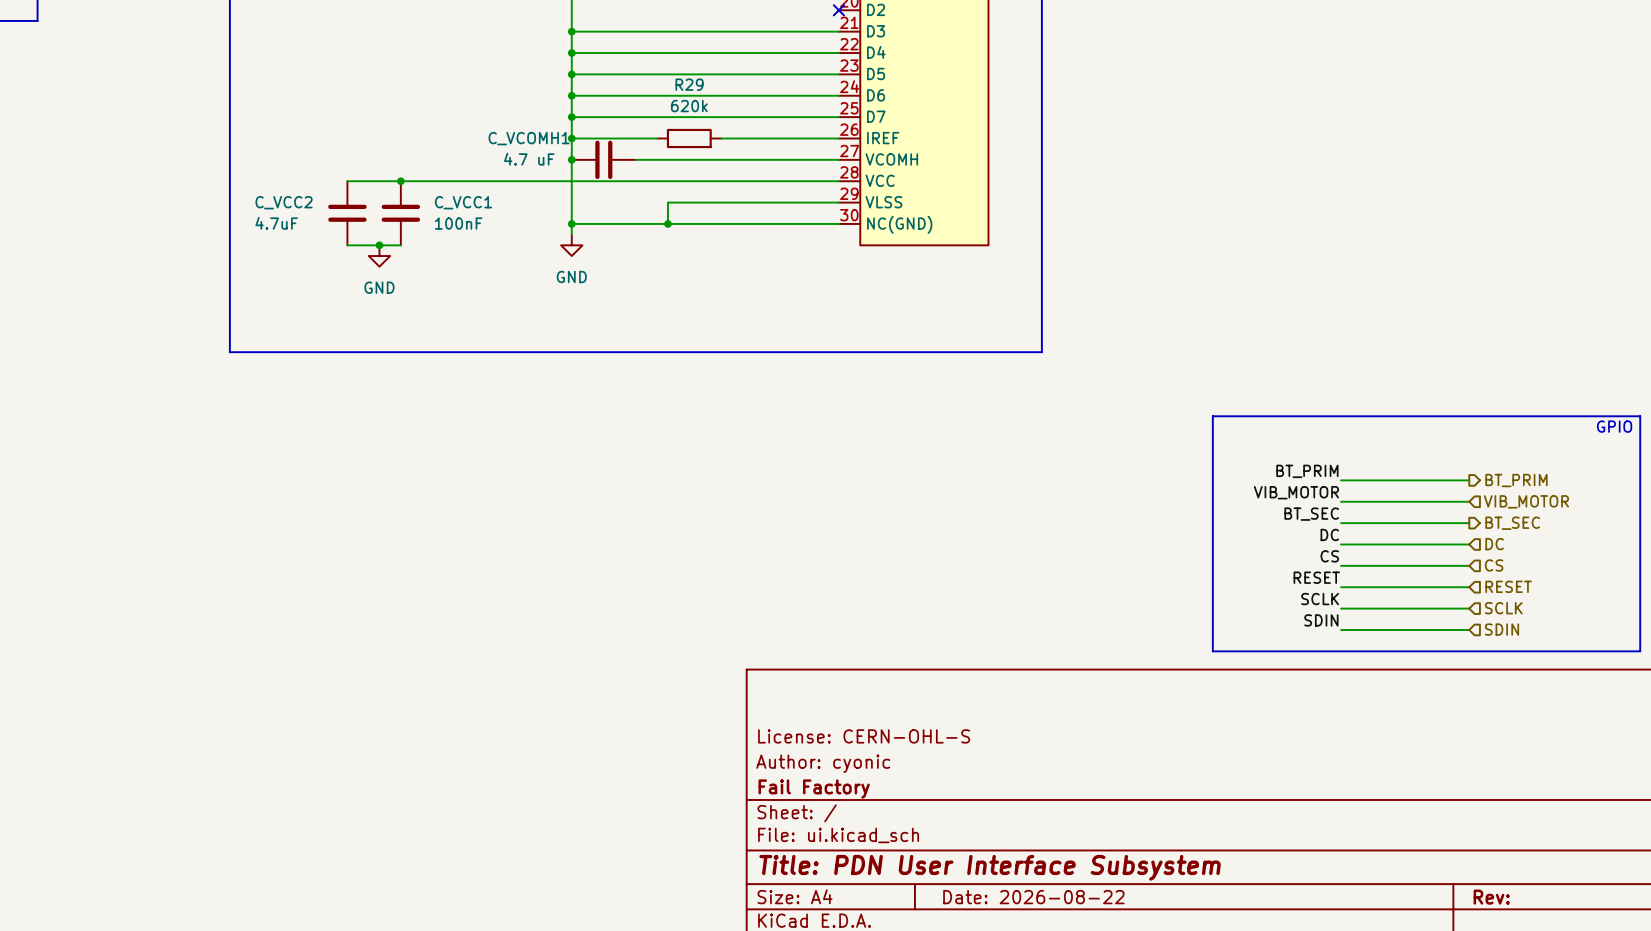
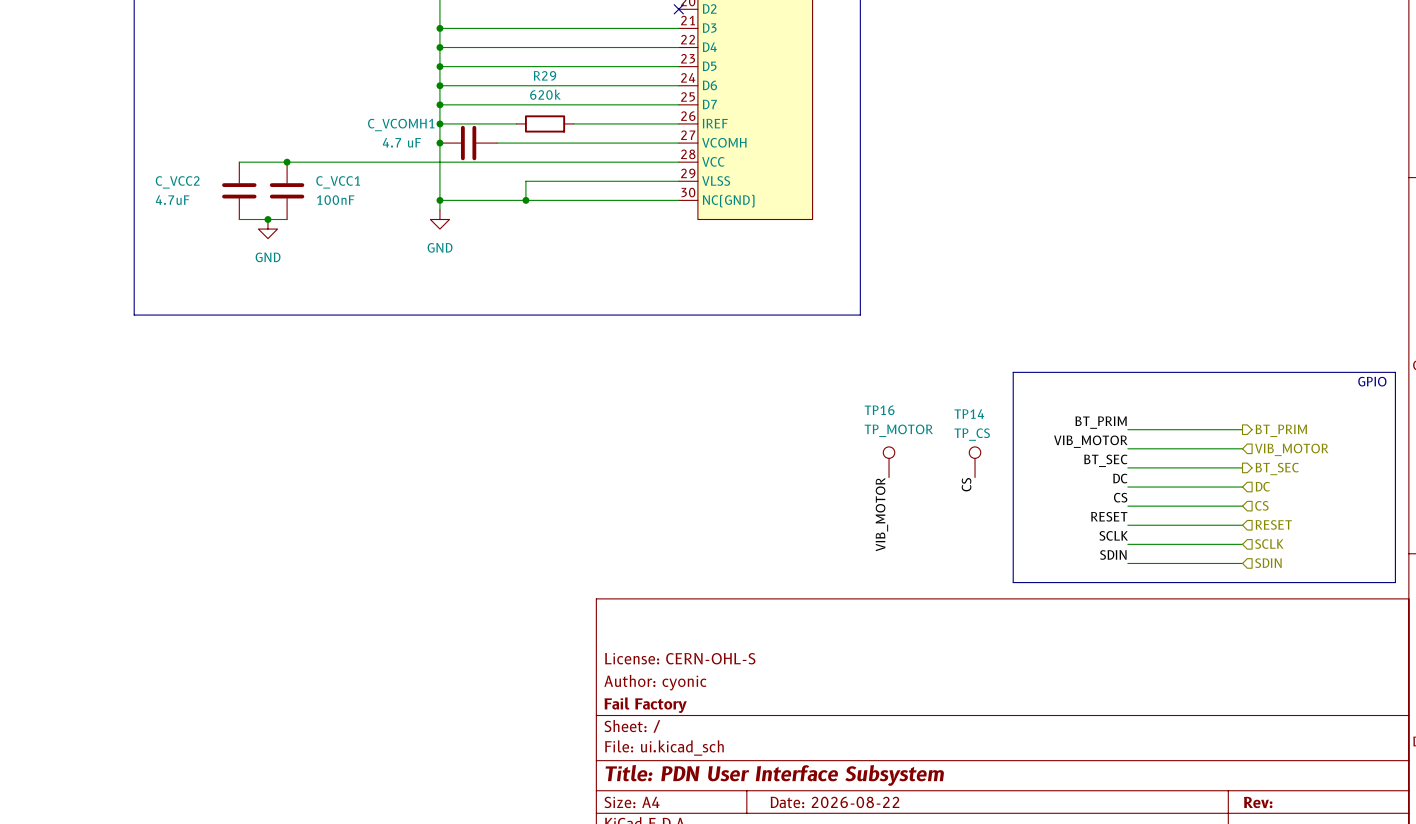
TP16: none -> TP_MOTOR (889, 462)
TP14: none -> TP_CS (975, 462)
label: none -> CS (966, 484)
label: none -> VIB_MOTOR (881, 514)

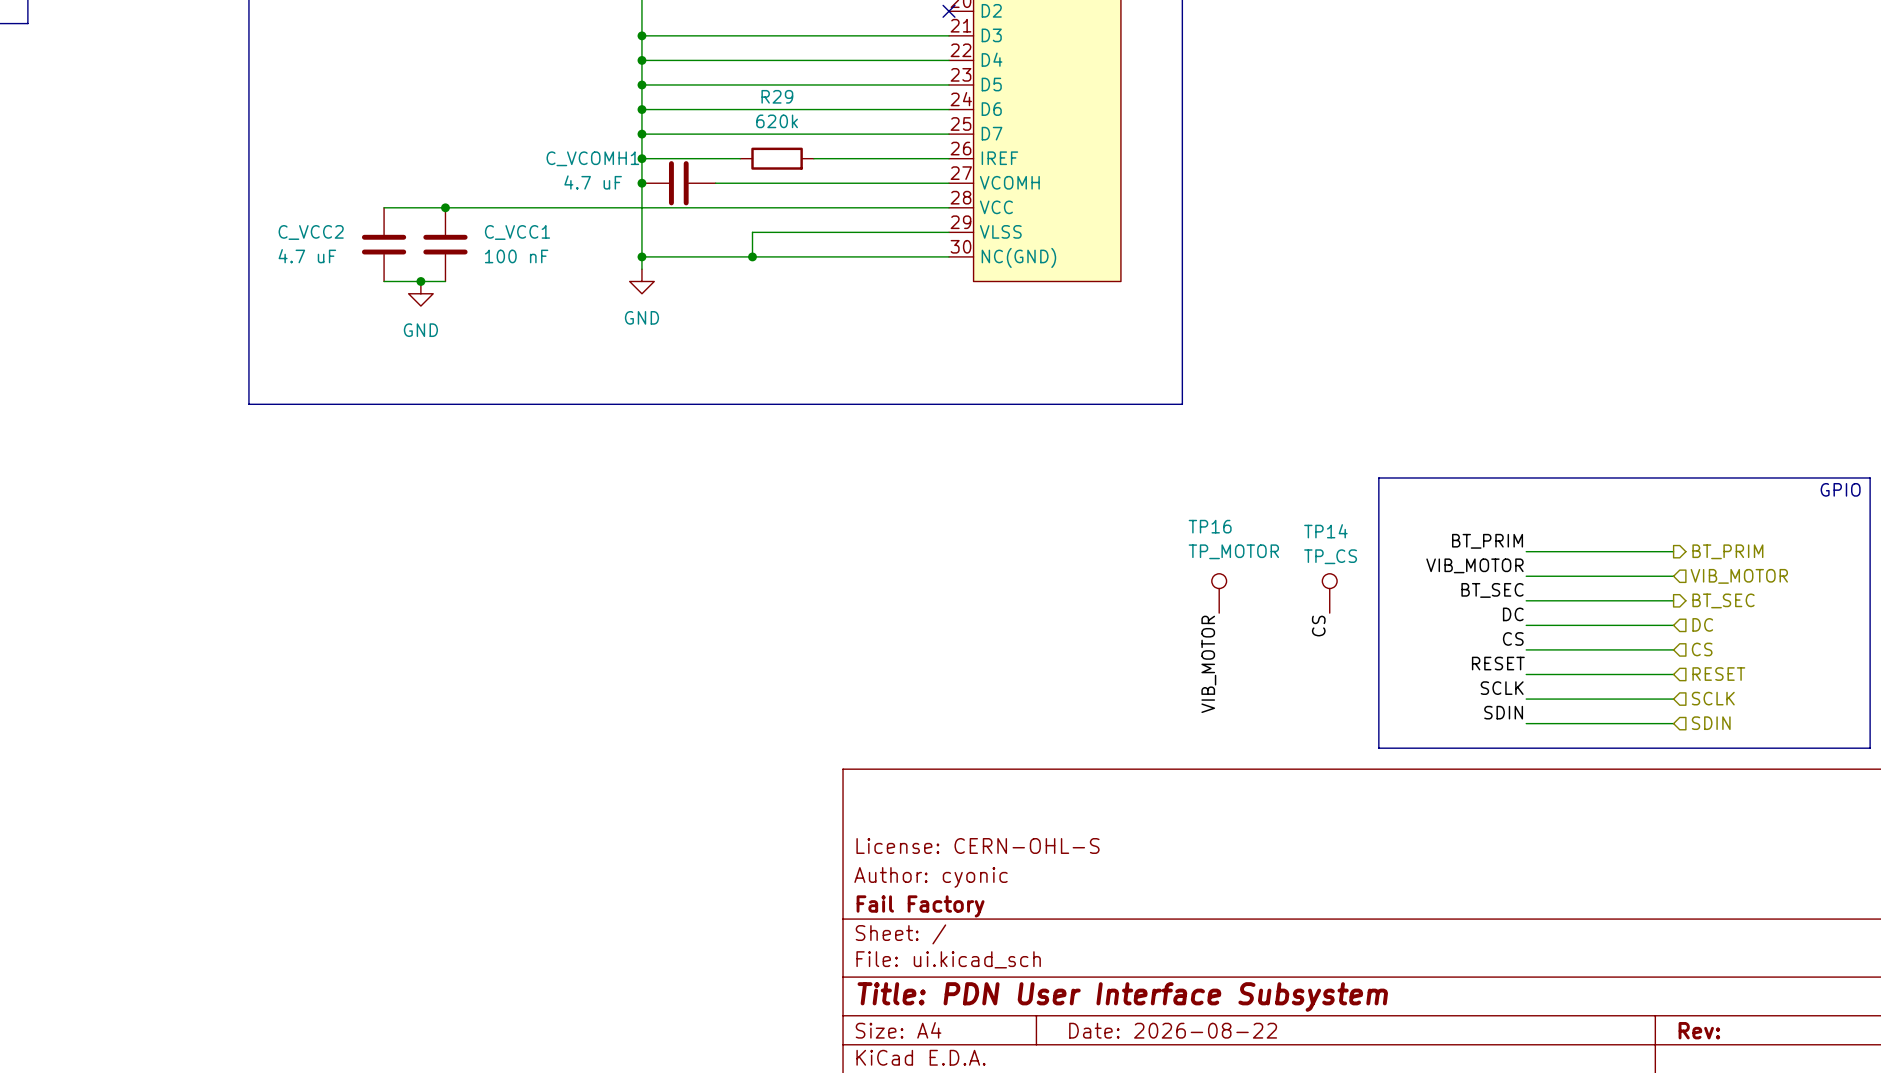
C_VCC2 value: 4.7uF (172, 200) -> 4.7 uF (307, 256)
C_VCC1 value: 100nF (335, 200) -> 100 nF (516, 256)

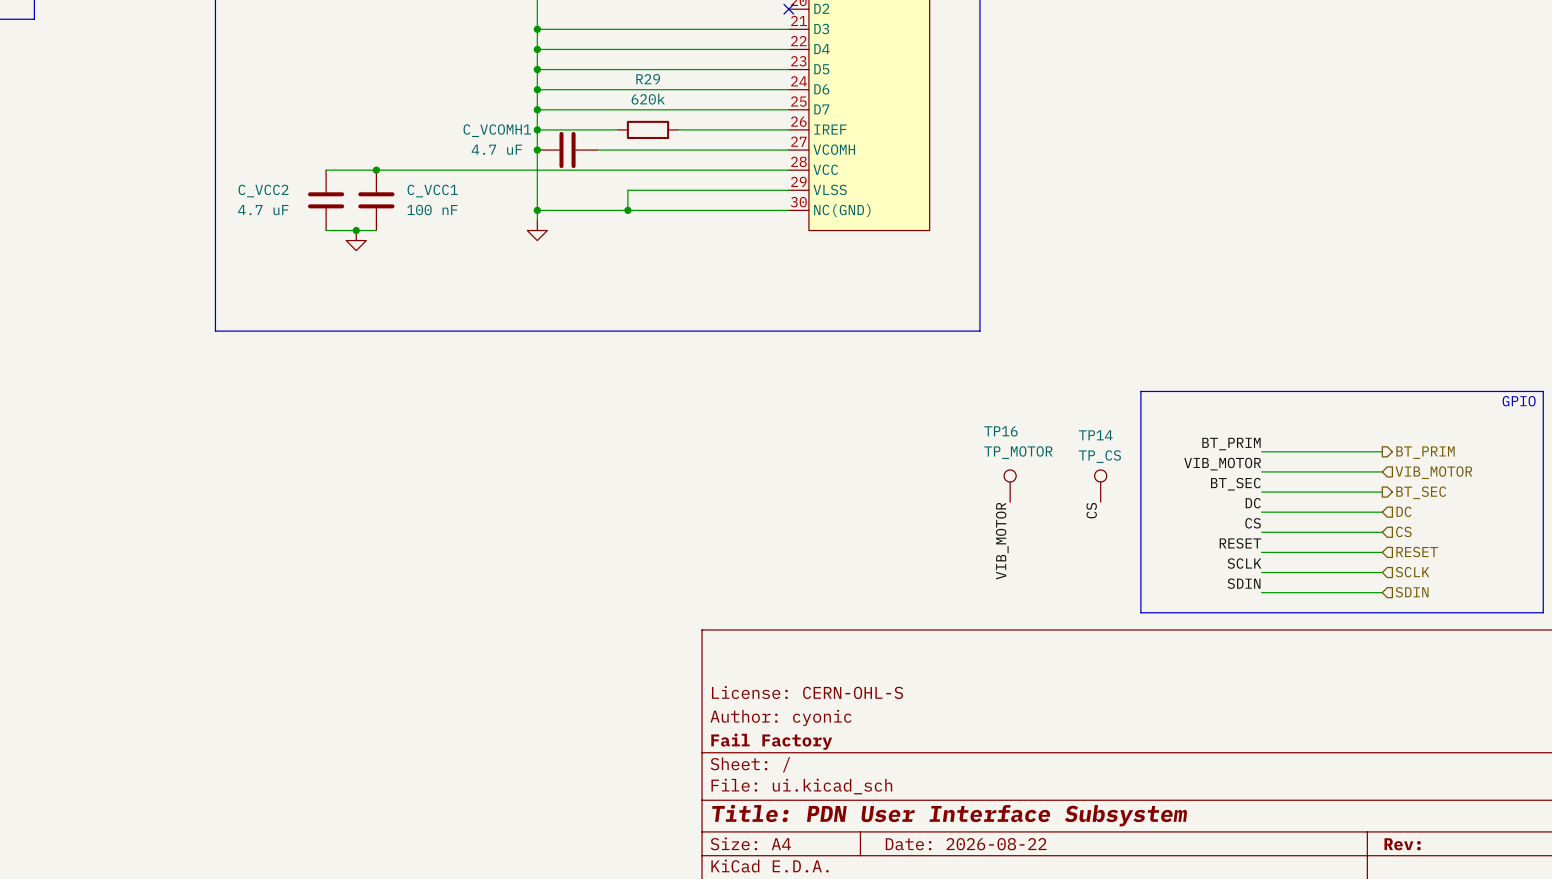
power symbol text: GND (641, 317) -> none
power symbol text: GND (420, 330) -> none

